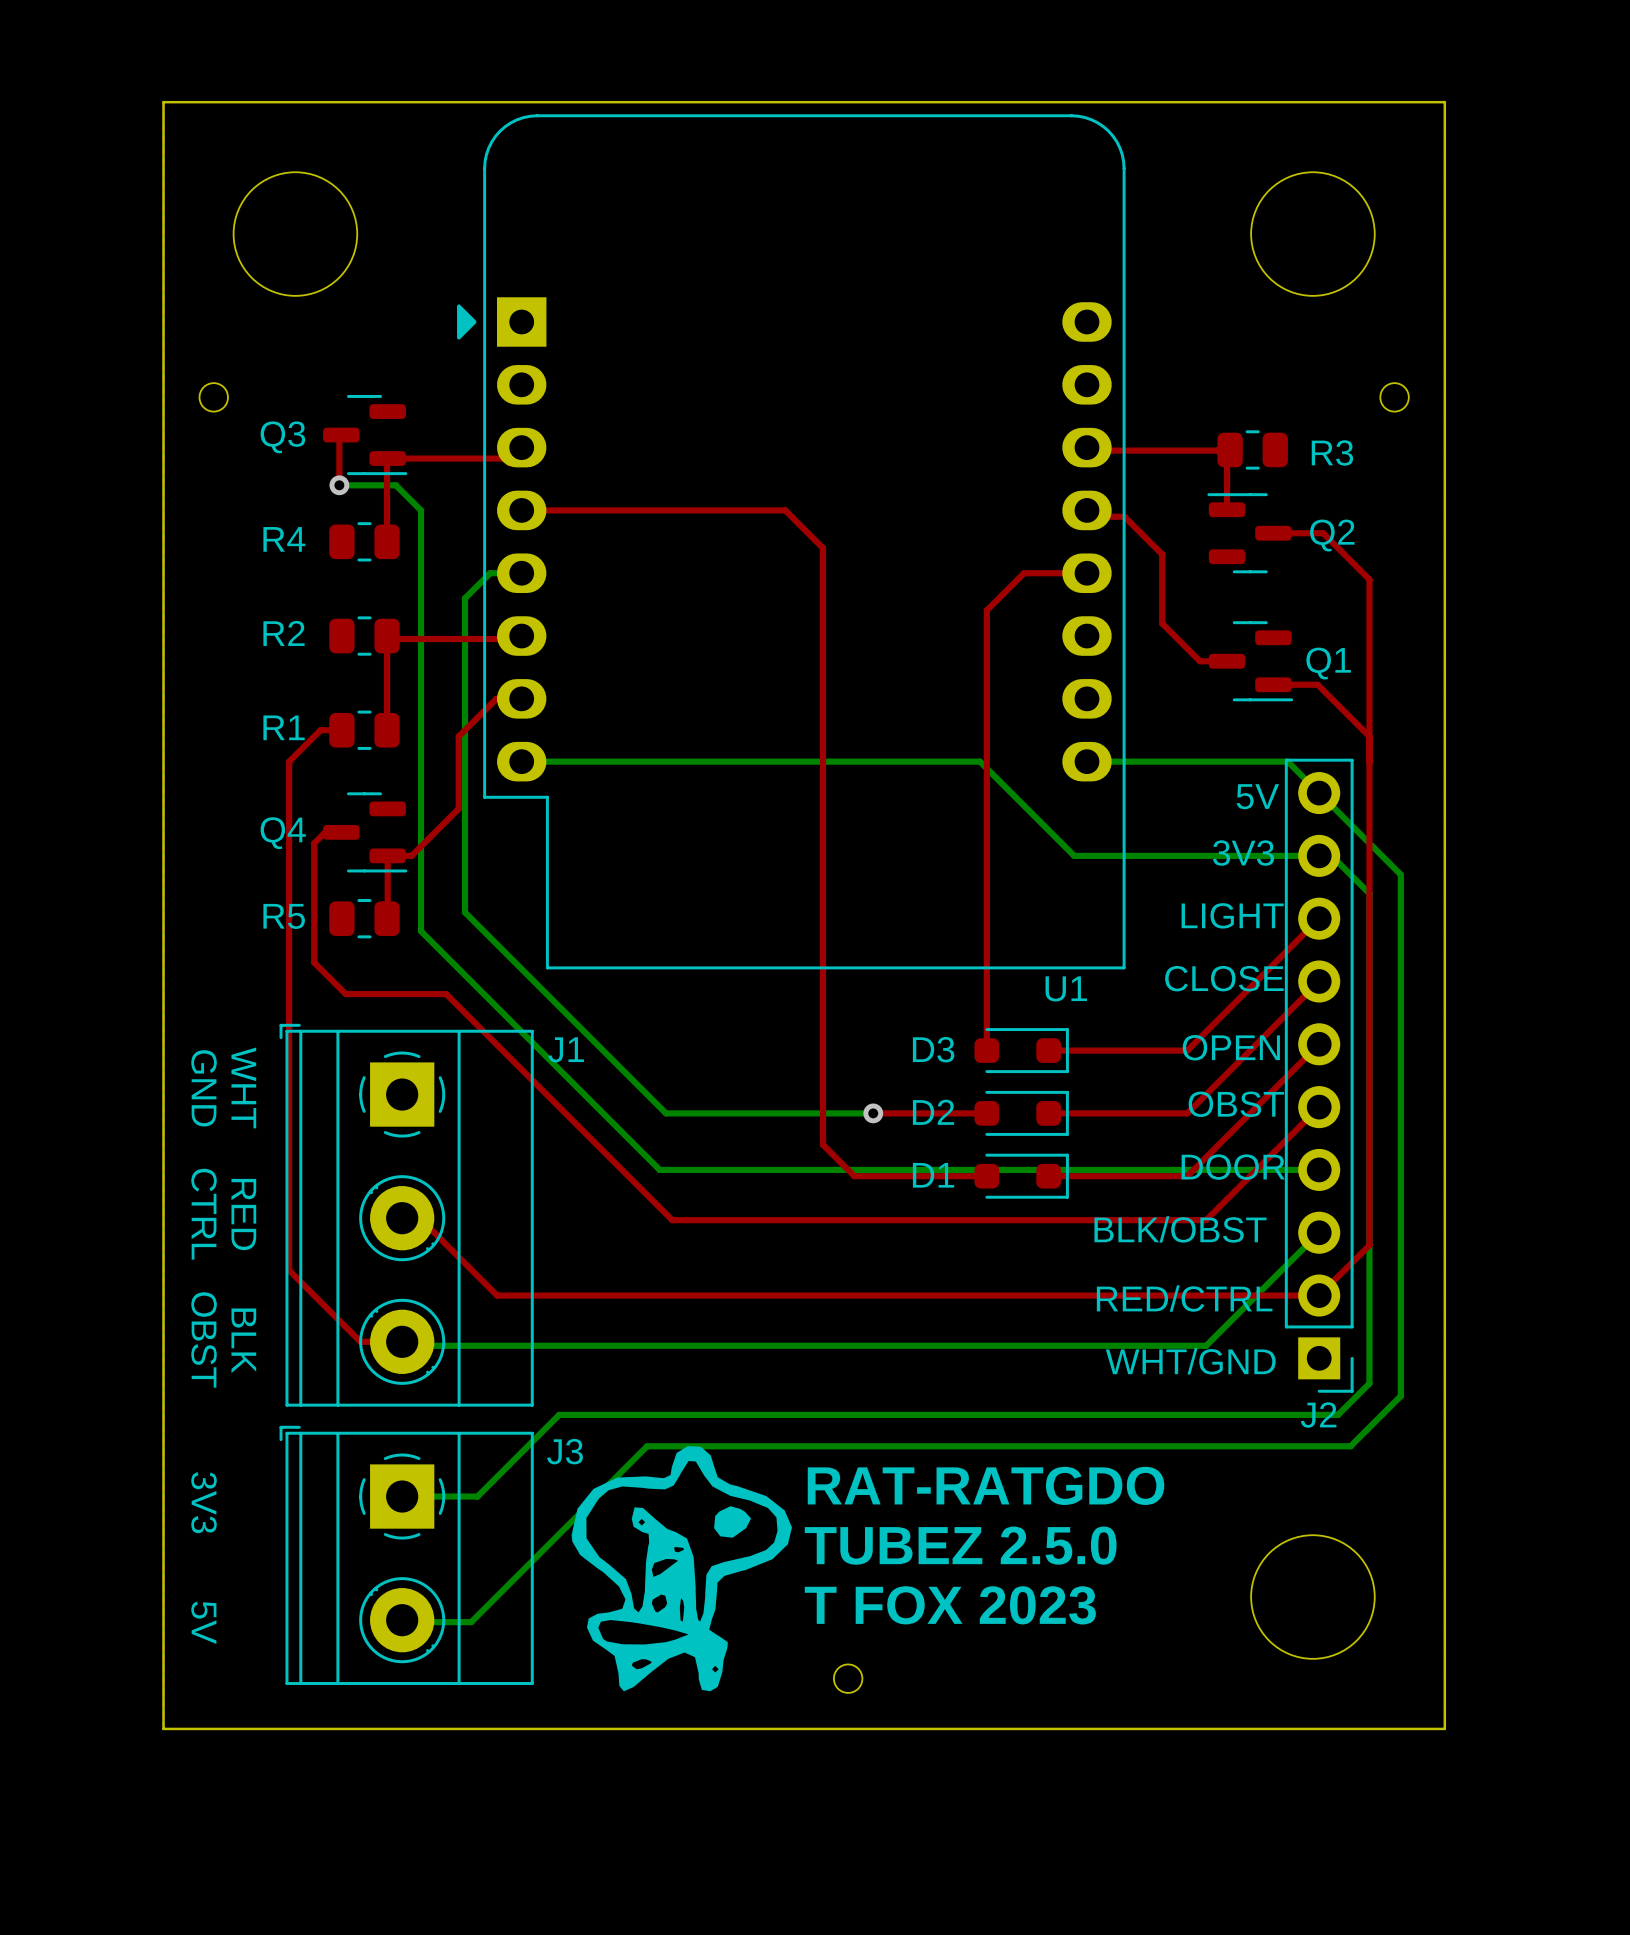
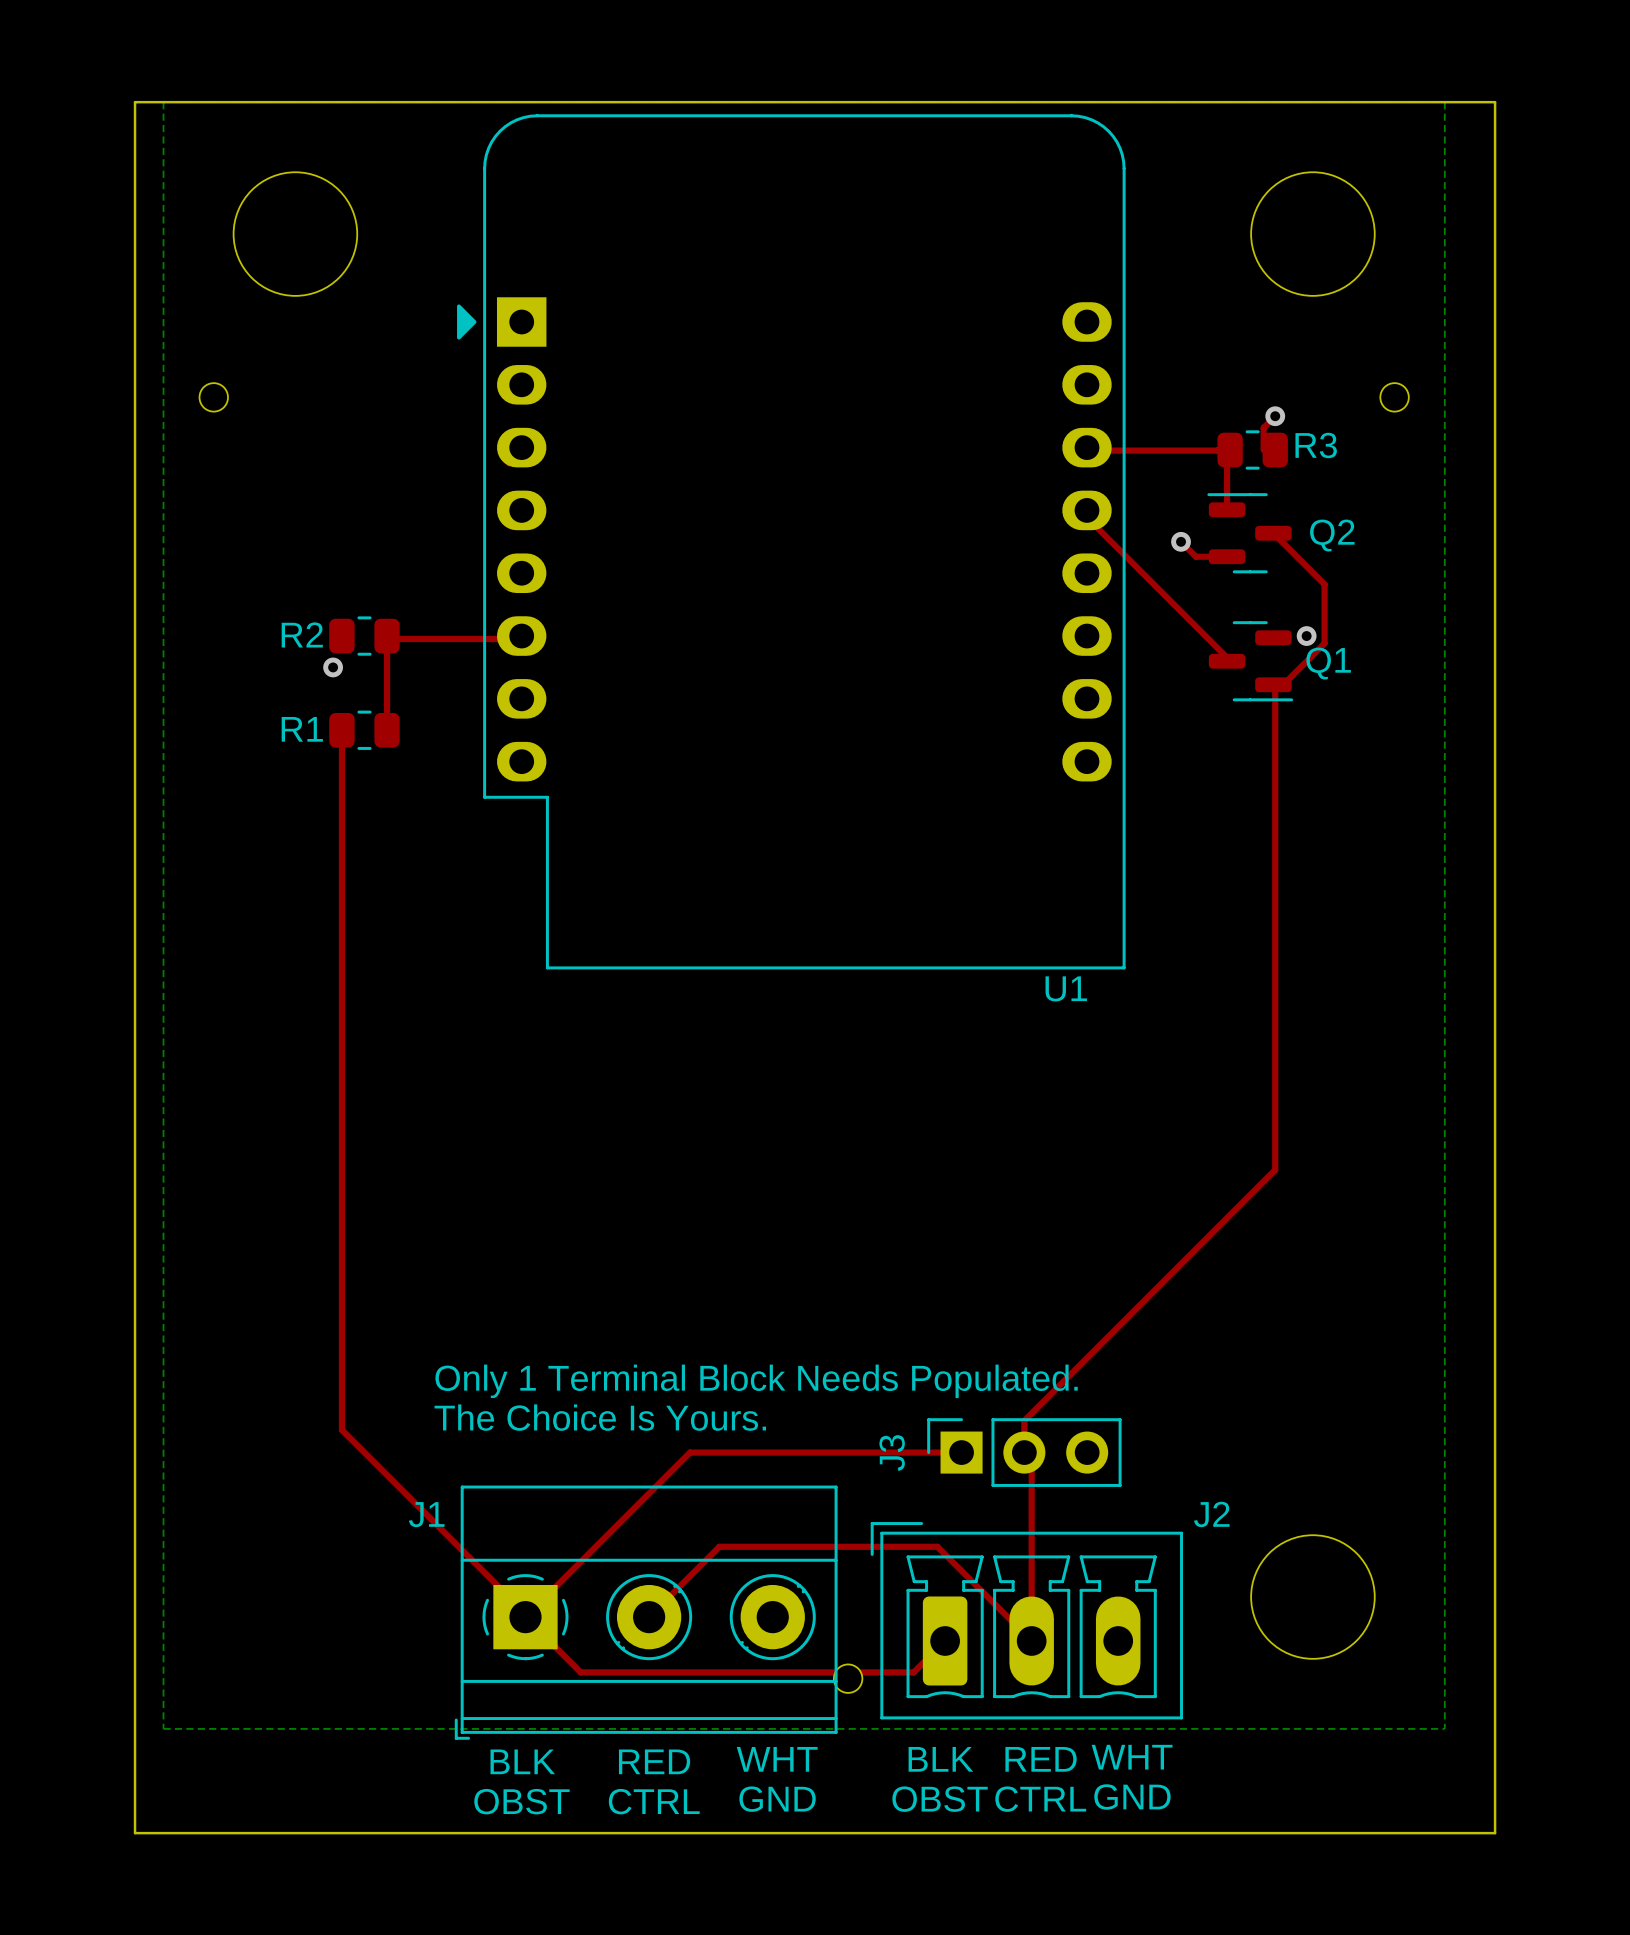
board edge: (163, 102) (163, 1728) (1444, 1728) (1444, 102) -> (163, 102) (135, 102) (135, 1833) (1495, 1833) (1495, 102) (1444, 102)
top track: none -> (1275, 416) (1263, 427) (1263, 449)
via: none -> (1275, 416)
Q3: (365, 435) -> none
top track: (339, 441) (339, 485) -> none
R3 name position: R3 (1332, 452) -> R3 (1316, 445)
top track: (387, 458) (510, 458) -> none
top track: (387, 463) (387, 541) -> none
bottom track: (339, 485) (395, 485) (421, 510) (421, 931) (659, 1169) (1319, 1169) -> none
via: (339, 485) -> none
top track: (521, 510) (785, 510) (823, 548) (823, 1144) (854, 1176) (986, 1176) -> none
top track: (1087, 516) (1124, 516) (1162, 554) (1162, 623) (1199, 661) (1230, 661) -> (1086, 513) (1086, 517) (1230, 661)
top track: (1273, 533) (1323, 533) (1369, 579) (1369, 1245) (1319, 1295) (497, 1295) (400, 1199) -> (1273, 533) (1324, 584) (1324, 643) (1281, 686) (1275, 686) (1275, 1169) (1024, 1420) (1024, 1452) (1031, 1459) (1031, 1640) (937, 1546) (719, 1546) (649, 1617)
R4: (364, 541) -> none
top track: none -> (1181, 541) (1195, 556) (1227, 556)
via: none -> (1181, 541)
bottom track: (521, 573) (490, 573) (464, 598) (464, 912) (665, 1113) (873, 1113) -> none
top track: (1086, 573) (1024, 573) (986, 610) (986, 1050) -> none
R2 name position: R2 (284, 633) -> R2 (302, 634)
via: none -> (1306, 636)
via: none -> (333, 667)
top track: (1273, 684) (1317, 684) (1369, 736) -> none
top track: (521, 698) (496, 698) (458, 736) (458, 808) (411, 855) (387, 855) (387, 918) -> none
R1 name position: R1 (284, 727) -> R1 (302, 729)
top track: (341, 730) (320, 730) (289, 761) (289, 1270) (360, 1341) (379, 1341) -> (341, 730) (341, 1430) (525, 1613) (525, 1617)
J2 footprint: [1284, 758, 1354, 1393] -> [870, 1522, 1184, 1720]
bottom track: (521, 761) (980, 761) (1074, 855) (1319, 855) -> none
bottom track: (1086, 761) (1287, 761) (1400, 874) (1400, 1396) (1350, 1446) (647, 1446) (471, 1622) (418, 1622) -> none
text: 5V (1257, 796) -> none
top track: (341, 832) (325, 832) (314, 843) (314, 962) (345, 994) (446, 994) (672, 1220) (1206, 1220) (1319, 1107) -> none
Q4: (365, 832) -> none
text: 3V3 (1243, 853) -> none
bottom track: (1331, 855) (1369, 893) (1369, 1383) (1338, 1414) (559, 1414) (477, 1496) (420, 1496) -> none
text: LIGHT (1232, 915) -> none
R5: (364, 918) -> none
top track: (1319, 918) (1187, 1050) (1048, 1050) -> none
text: CLOSE (1224, 978) -> none
top track: (1319, 981) (1187, 1113) (1048, 1113) -> none
top track: (1319, 1044) (1187, 1176) (1048, 1176) -> none
text: OPEN (1231, 1047) -> none
J1 name position: J1 (566, 1049) -> J1 (426, 1514)
D3: (1021, 1050) -> none
text: WHT (243, 1087) -> none
text: GND (204, 1088) -> none
text: OBST (1236, 1104) -> none
top track: (873, 1113) (986, 1113) -> none
via: (873, 1113) -> none
D2: (1021, 1113) -> none
text: DOOR (1233, 1167) -> none
D1: (1021, 1176) -> none
text: CTRL (204, 1214) -> none
text: RED (243, 1214) -> none
J1 rotation: 0° (406, 1215) -> 90° counterclockwise (646, 1612)
J1 position: (406, 1215) -> (646, 1612)
text: BLK/OBST (1180, 1229) -> none
bottom track: (1319, 1232) (1206, 1345) (423, 1345) -> none
text: RED/CTRL (1184, 1298) -> none
text: OBST (204, 1339) -> none
text: BLK (243, 1340) -> none
text: WHT/GND (1190, 1361) -> none
text: none -> Only 1 Terminal Block Needs Populated. (756, 1381)
J2 name position: J2 (1318, 1415) -> J2 (1211, 1514)
text: none -> The Choice Is Yours. (600, 1417)
J3 footprint: [279, 1425, 534, 1685] -> [927, 1418, 1122, 1487]
drawing: [571, 1446, 792, 1692] -> none
J3 name position: J3 (564, 1451) -> J3 (892, 1453)
top track: none -> (961, 1452) (690, 1452) (525, 1617)
text: RAT-RATGDO (986, 1485) -> none
text: 3V3 (204, 1502) -> none
text: TUBEZ 2.5.0 (960, 1545) -> none
text: T FOX 2023 (950, 1605) -> none
top track: none -> (525, 1617) (580, 1672) (913, 1672) (945, 1640)
text: 5V (203, 1622) -> none
text: none -> WHT (1132, 1757)
text: none -> WHT (777, 1759)
text: none -> BLK (940, 1759)
text: none -> RED (1041, 1759)
text: none -> BLK (522, 1761)
text: none -> RED (654, 1761)
text: none -> GND (1132, 1796)
text: none -> GND (777, 1799)
text: none -> OBST (940, 1799)
text: none -> CTRL (1040, 1799)
text: none -> OBST (521, 1801)
text: none -> CTRL (654, 1801)

